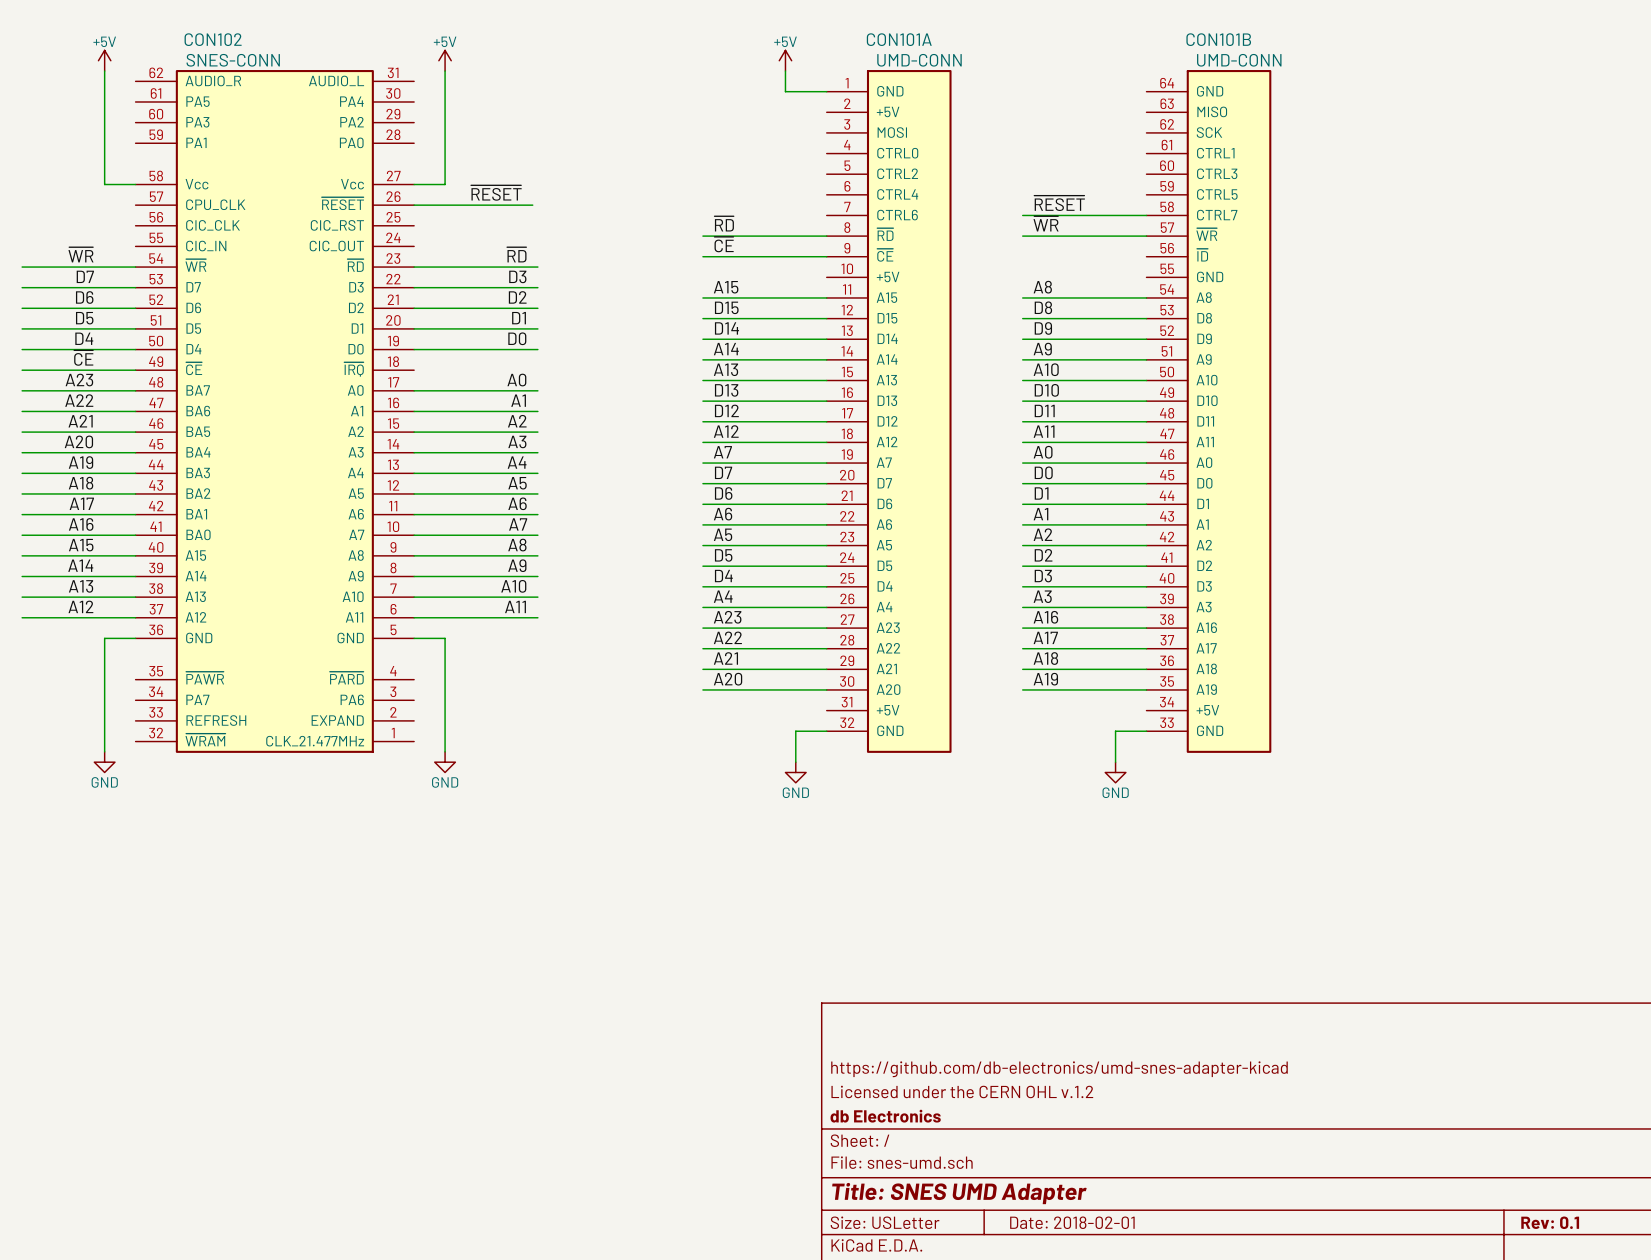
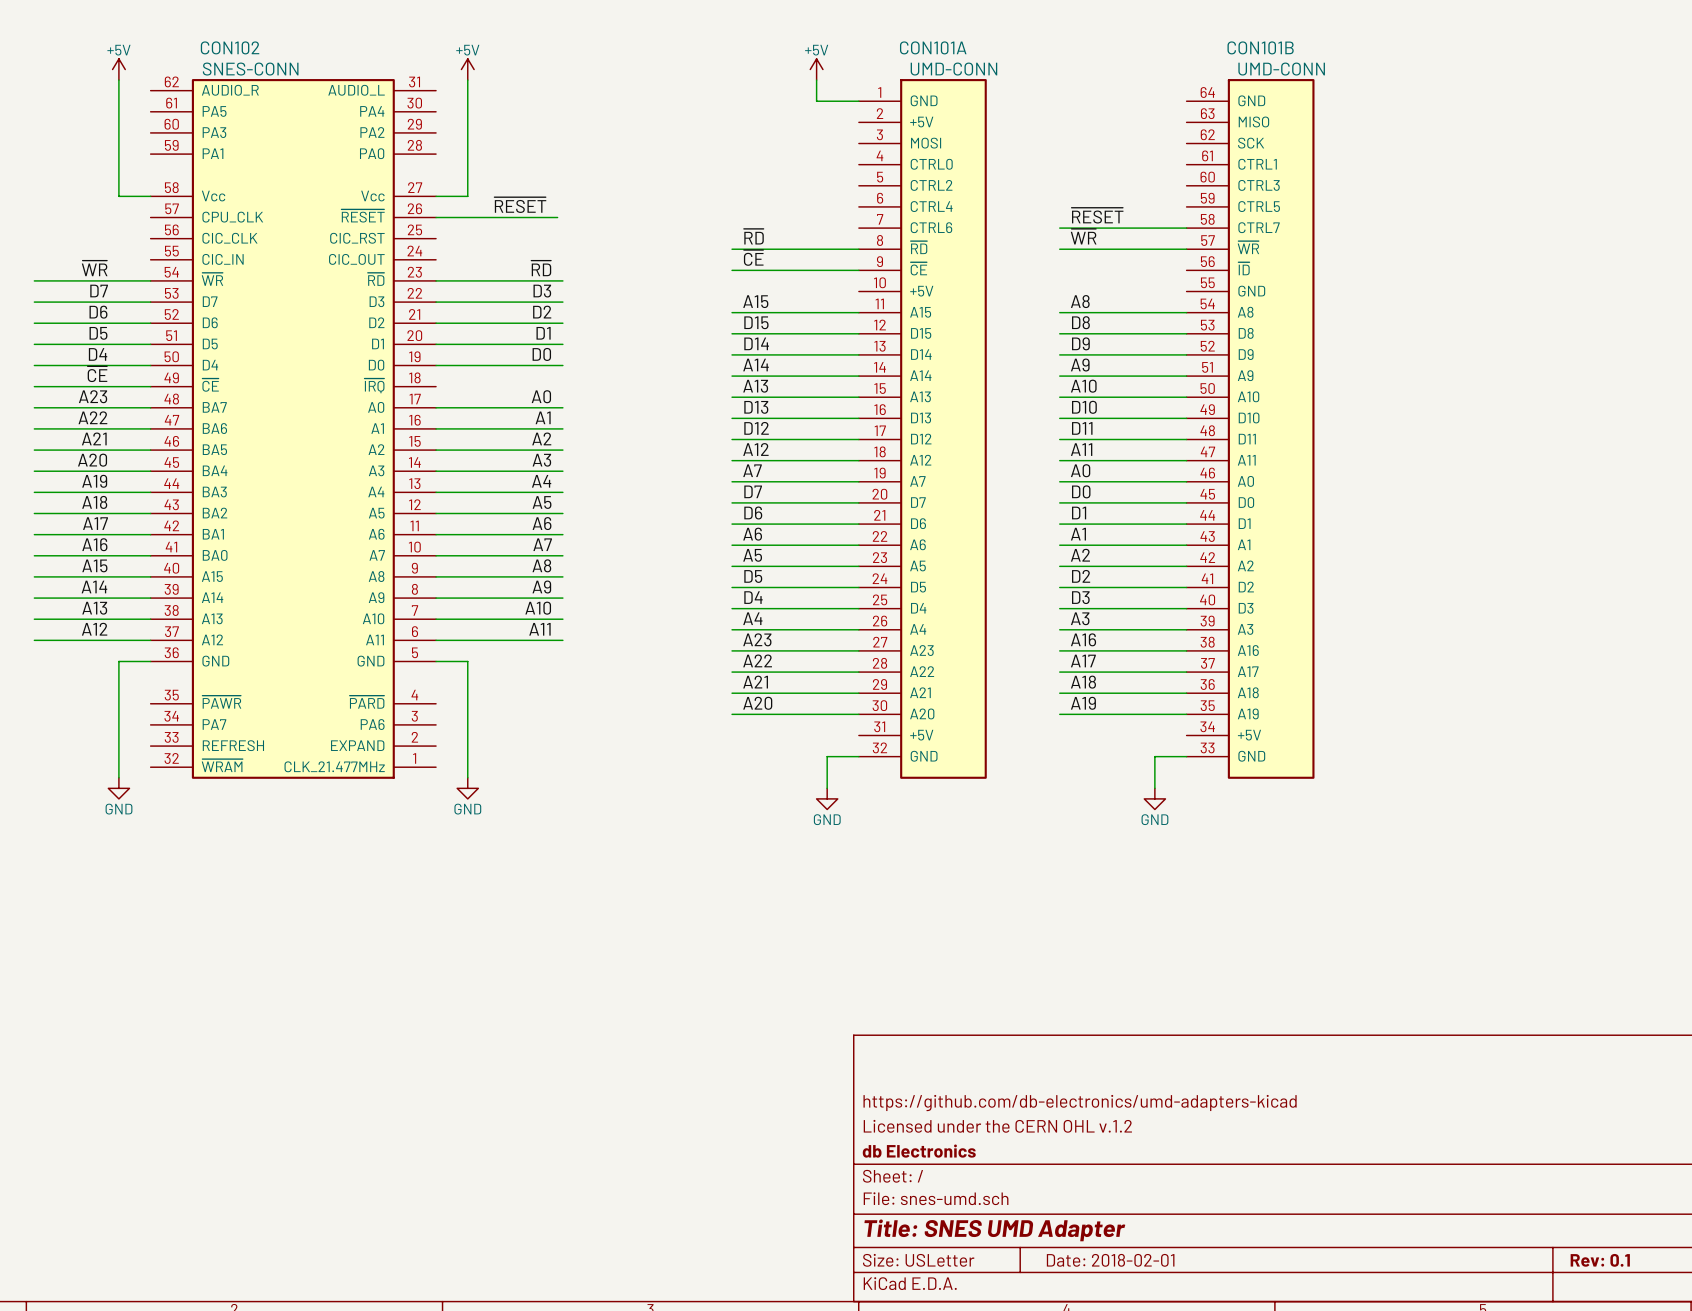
title block: https://github.com/db-electronics/umd-snes-adapter-kicad (1059, 1069) -> https://github.com/db-electronics/umd-adapters-kicad (1080, 1103)

